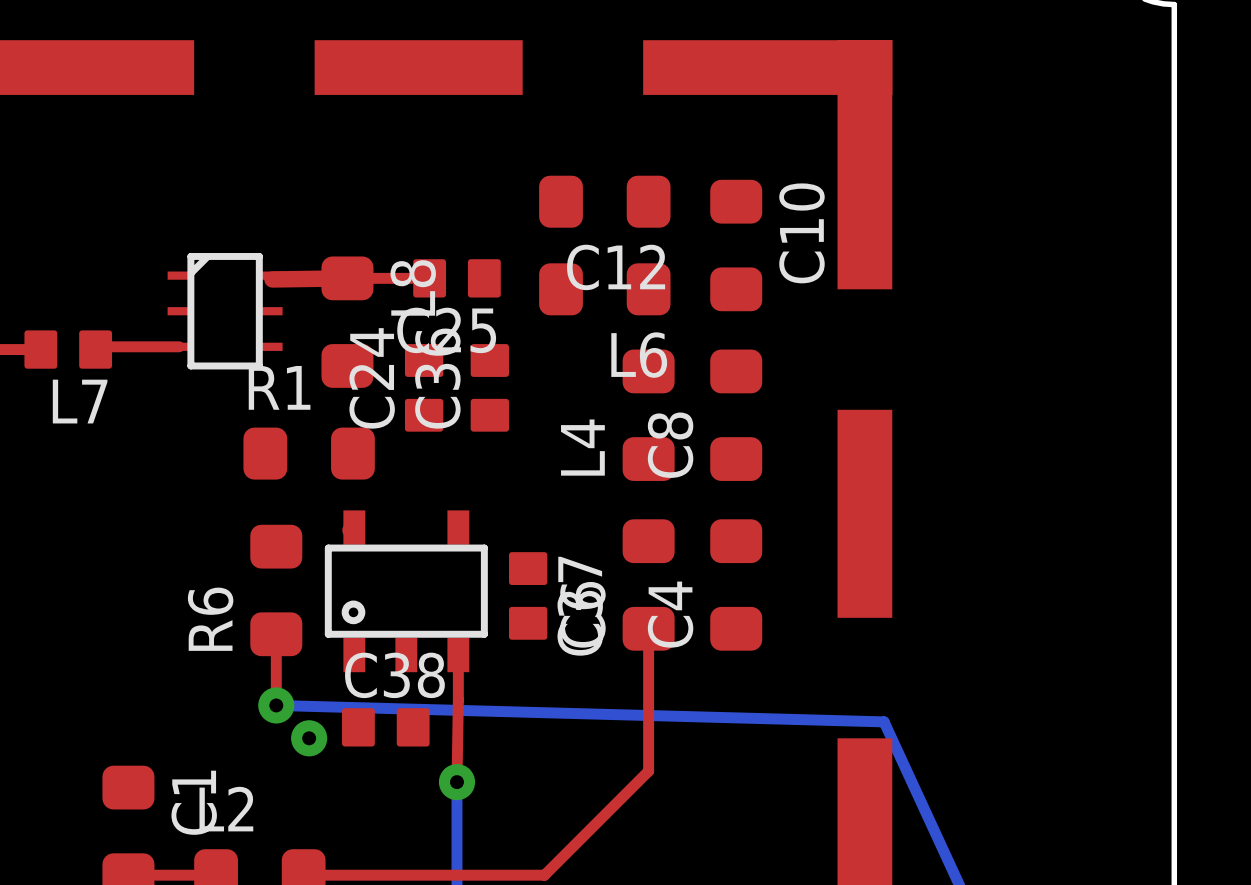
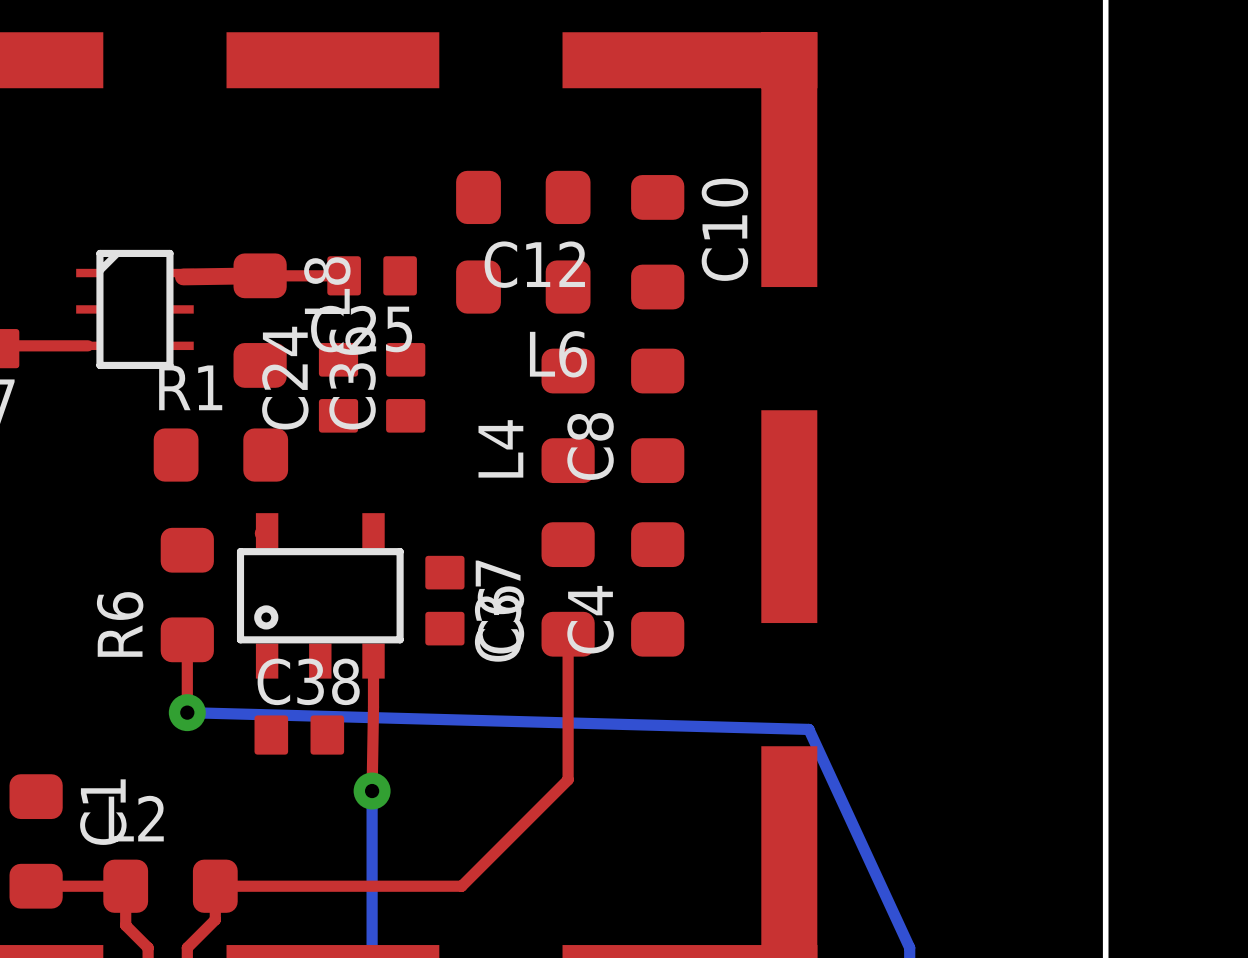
via: (309, 738) -> none

